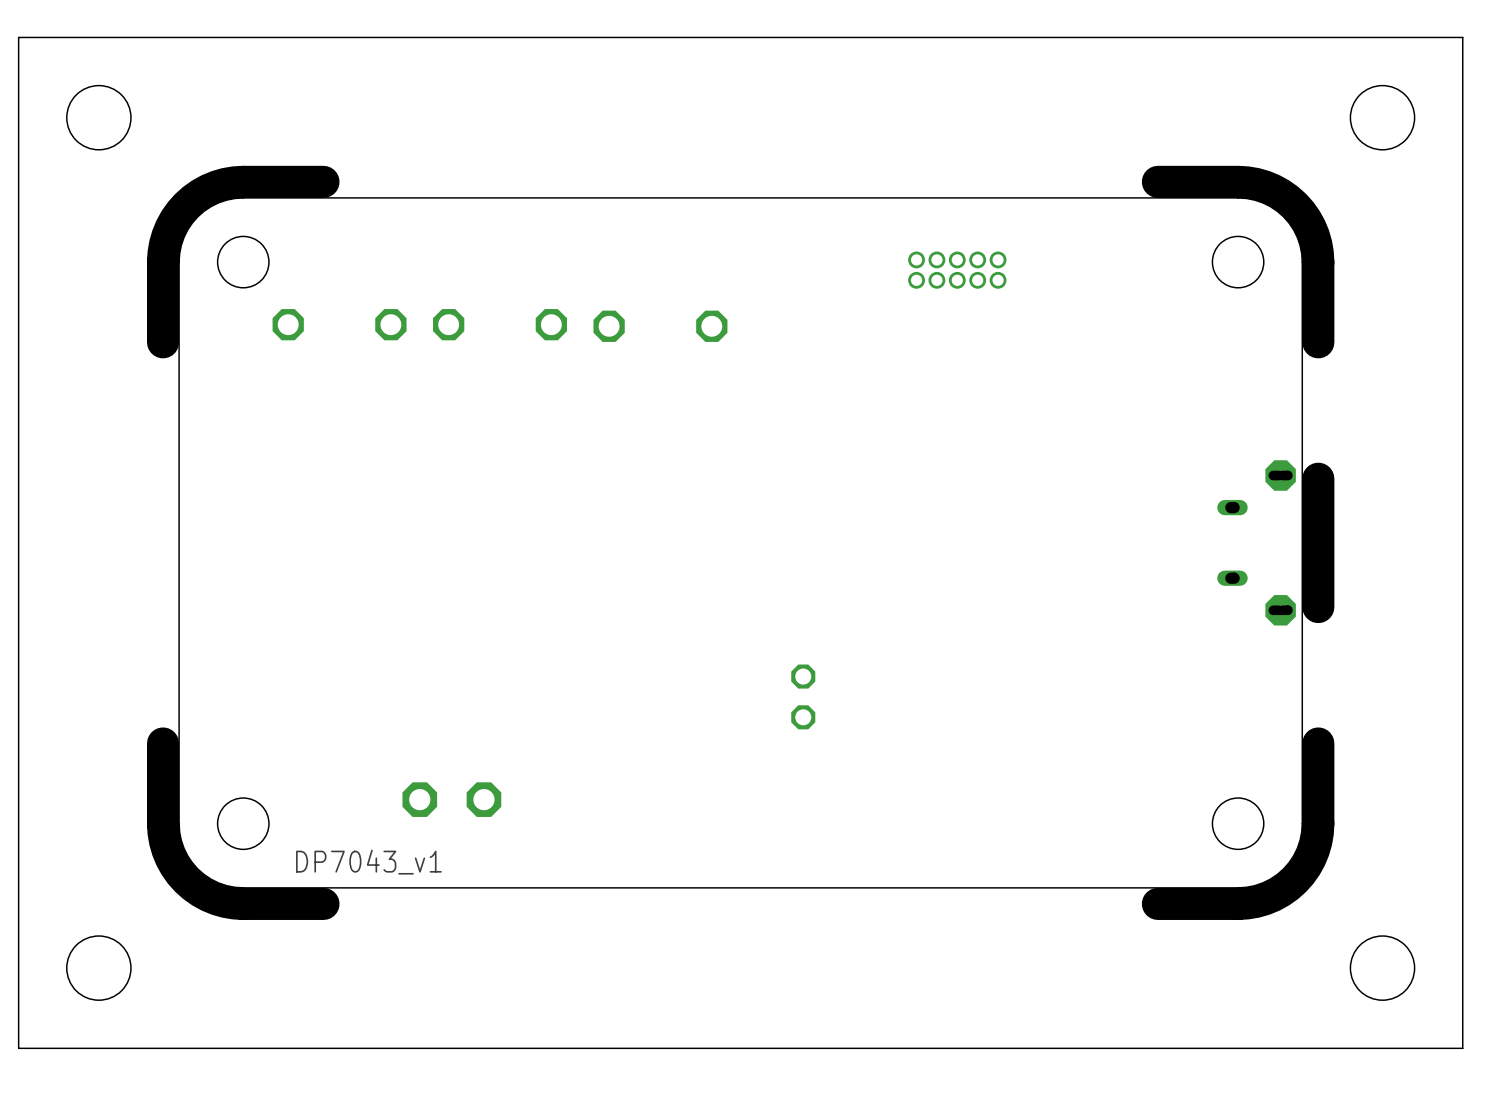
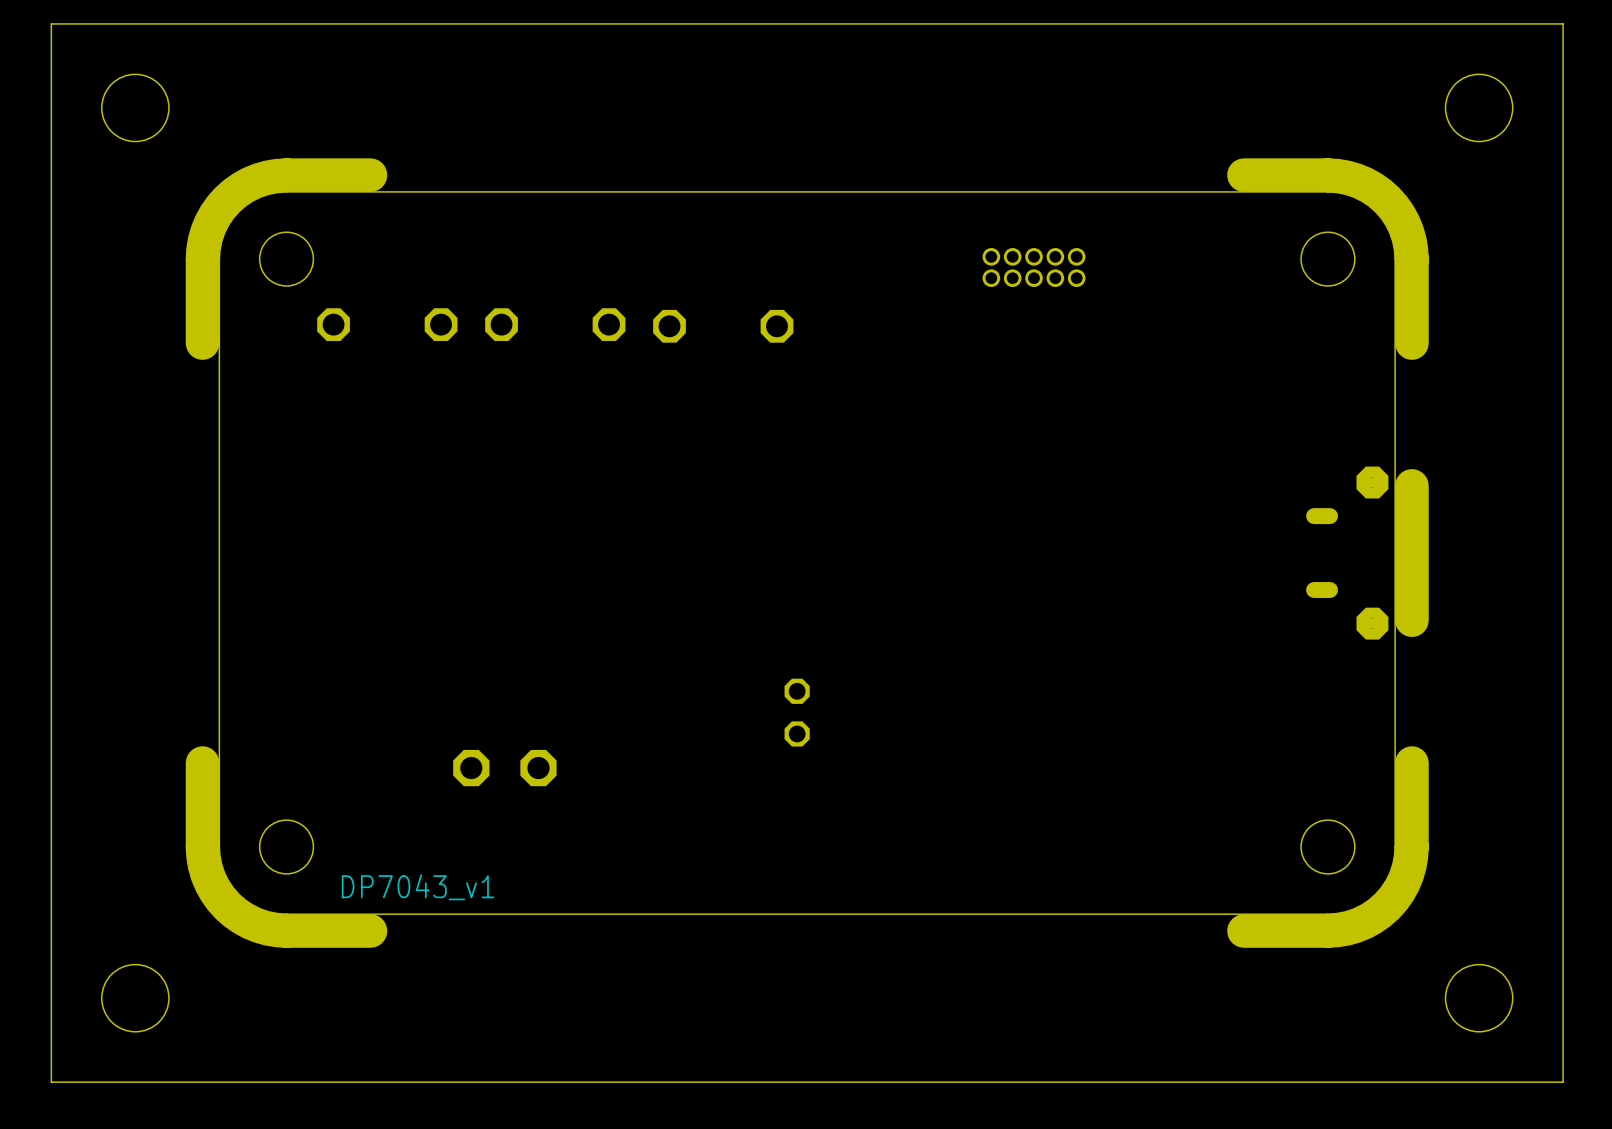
part position: (803, 696) -> (797, 712)
part: none -> (471, 768)
part: none -> (538, 768)
part: (419, 799) -> none
part: (483, 799) -> none

